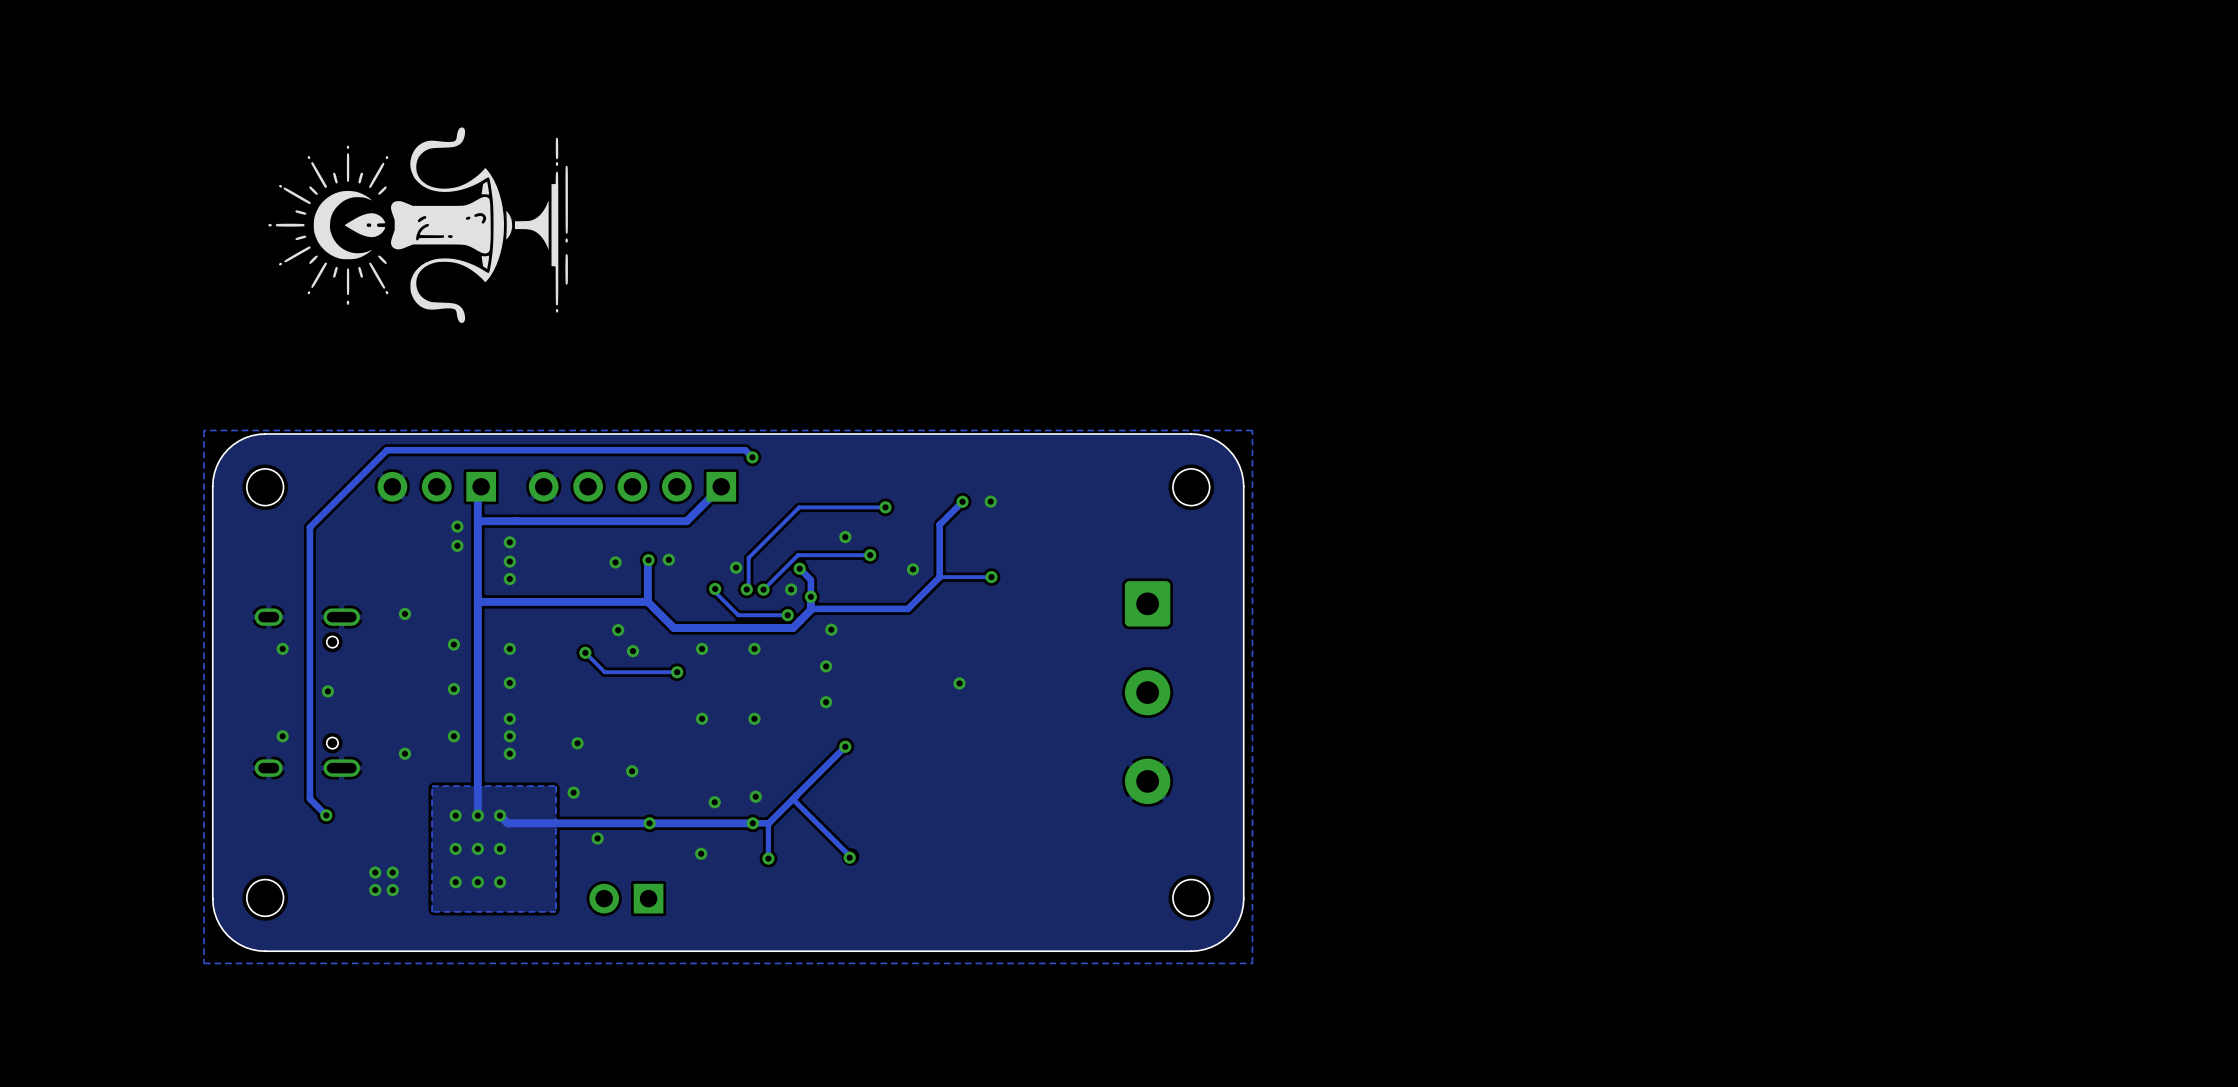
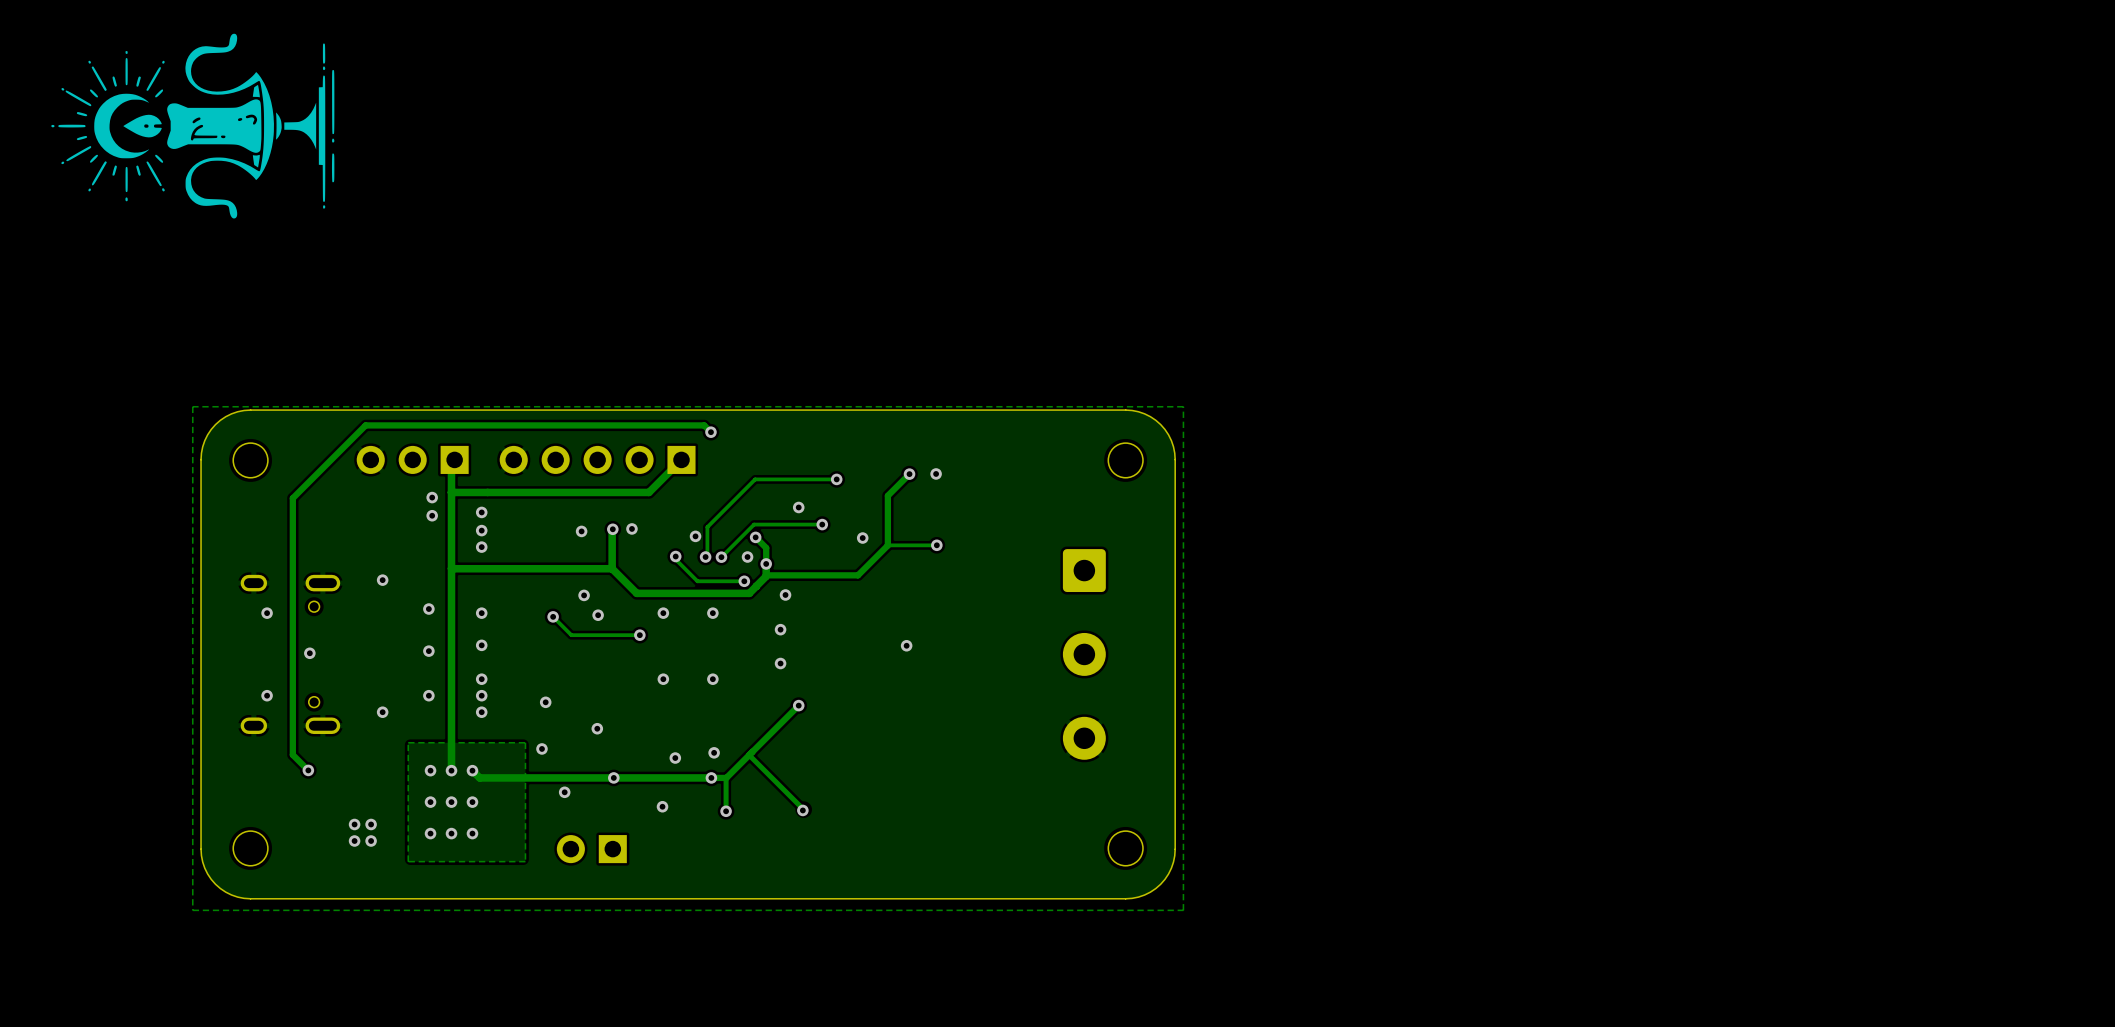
drawing position: (418, 225) -> (192, 126)

